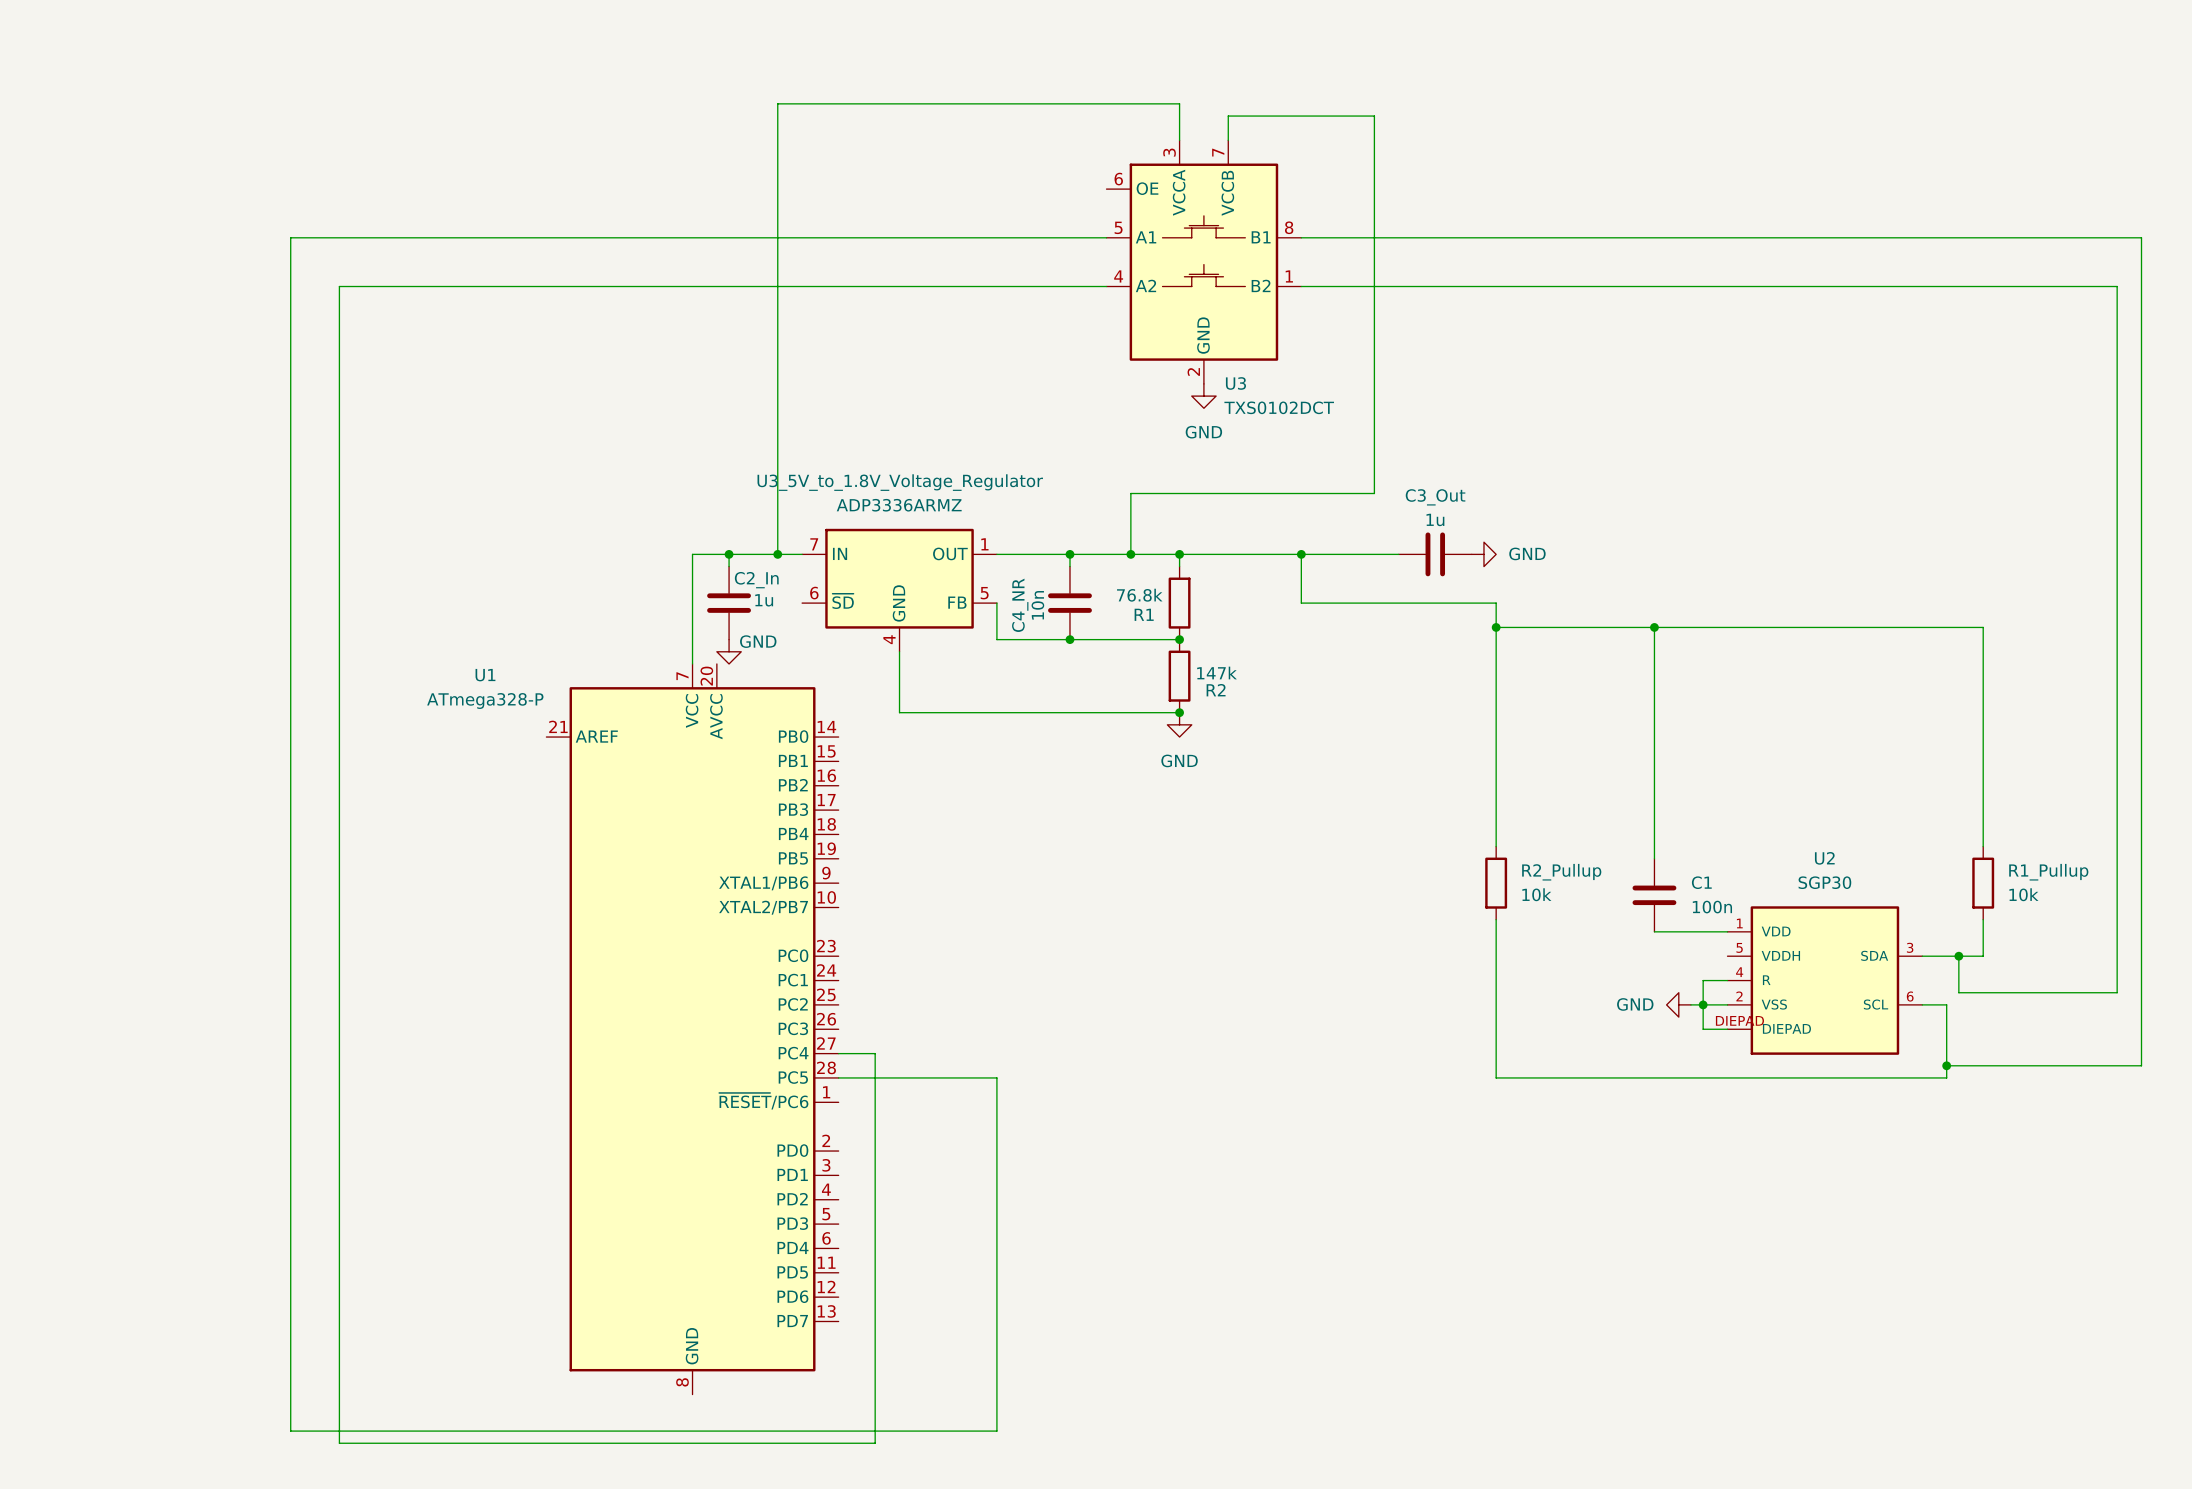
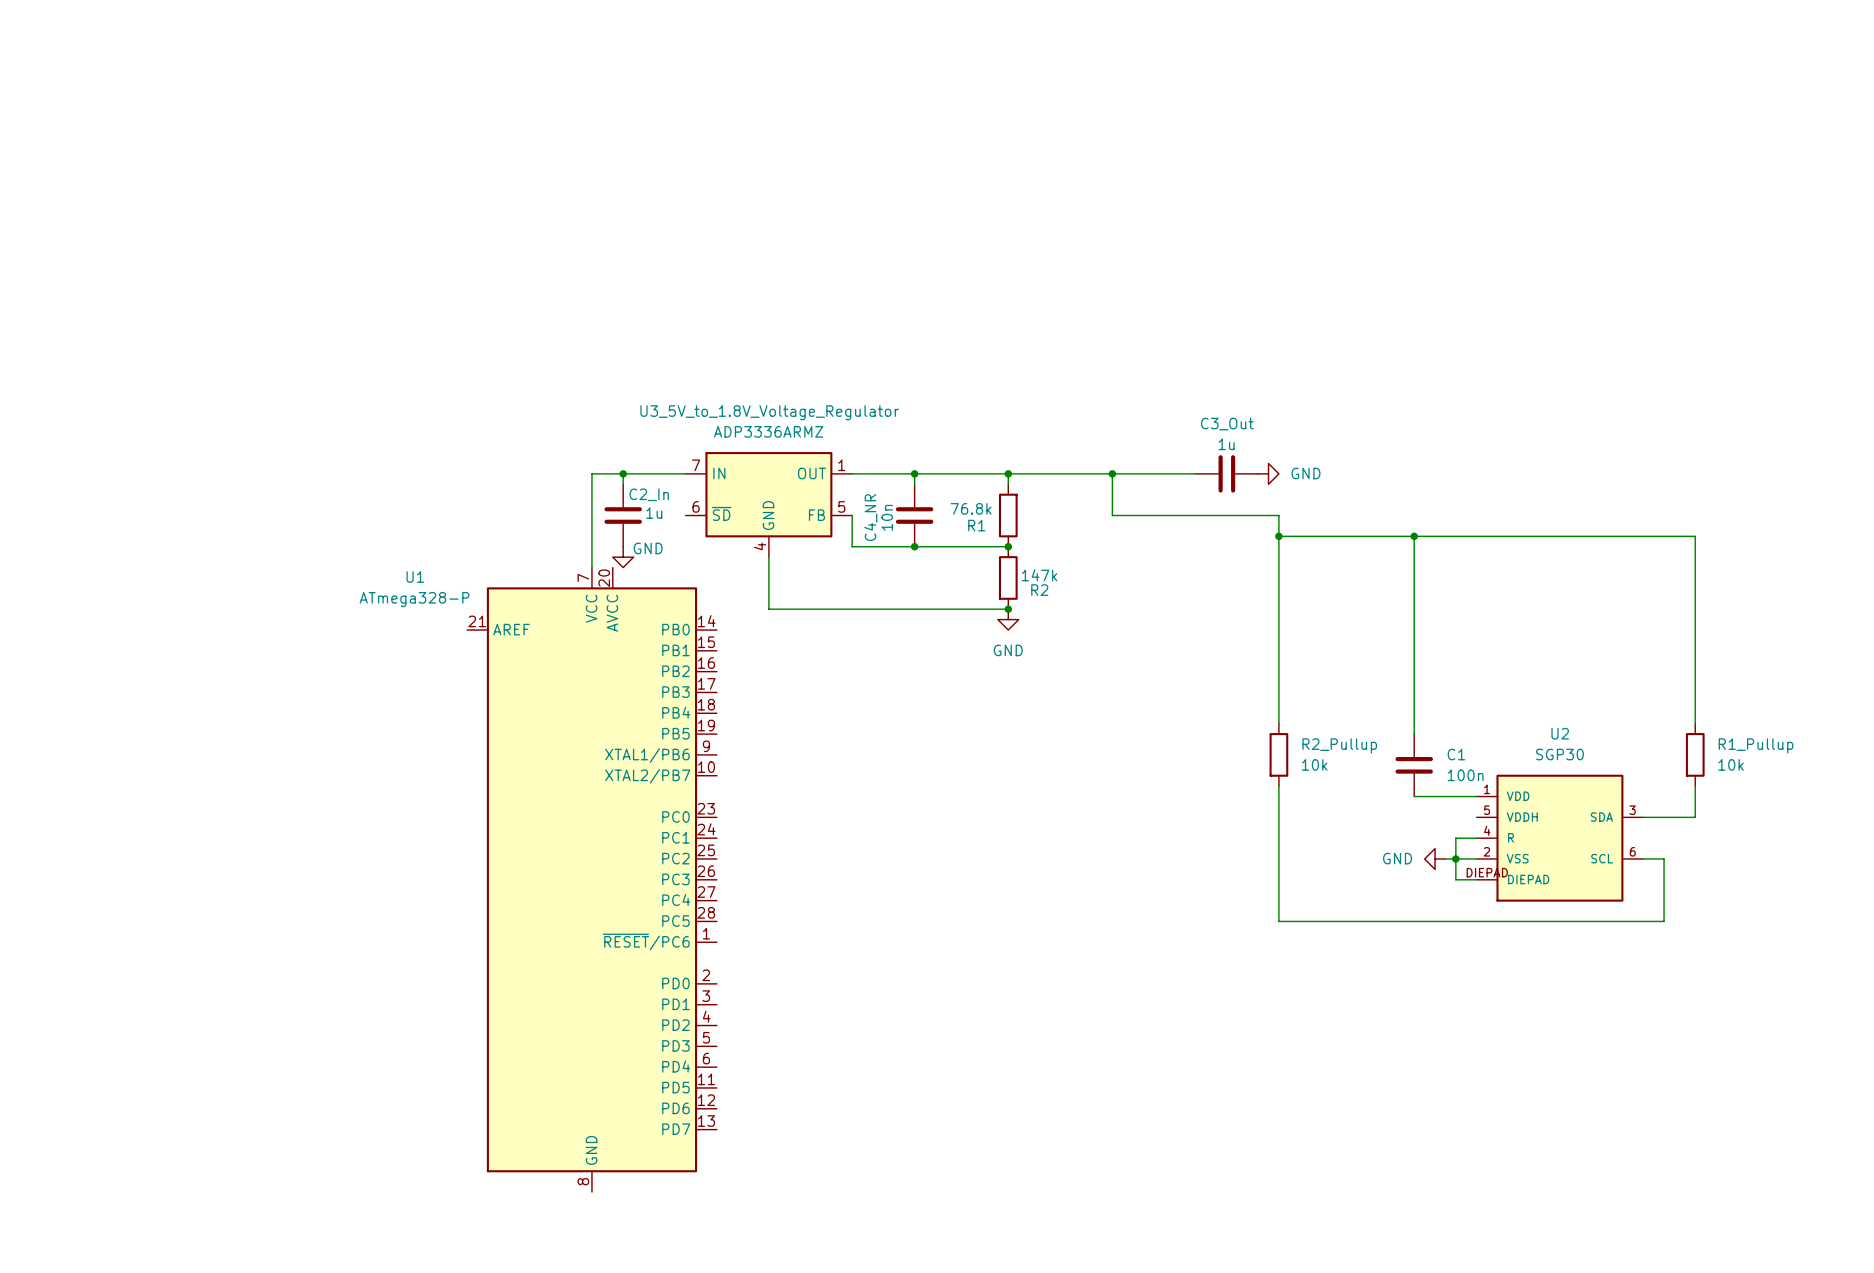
wire: (1179, 140) (1179, 103) (777, 103) (777, 554) -> none
wire: (1228, 140) (1228, 116) (1374, 116) (1374, 493) (1130, 493) (1130, 554) -> none
wire: (1106, 237) (290, 237) (290, 1431) (996, 1431) (996, 1077) (838, 1077) -> none
wire: (1301, 237) (2141, 237) (2141, 1065) (1946, 1065) -> none
U3: TXS0102DCT (1203, 262) -> none
wire: (1106, 286) (339, 286) (339, 1443) (875, 1443) (875, 1053) (838, 1053) -> none
wire: (1301, 286) (2117, 286) (2117, 992) (1958, 992) (1958, 956) -> none
power symbol: GND (1203, 396) -> none
junction: (777, 554) -> none
junction: (1130, 554) -> none
junction: (1958, 956) -> none
junction: (1946, 1065) -> none

